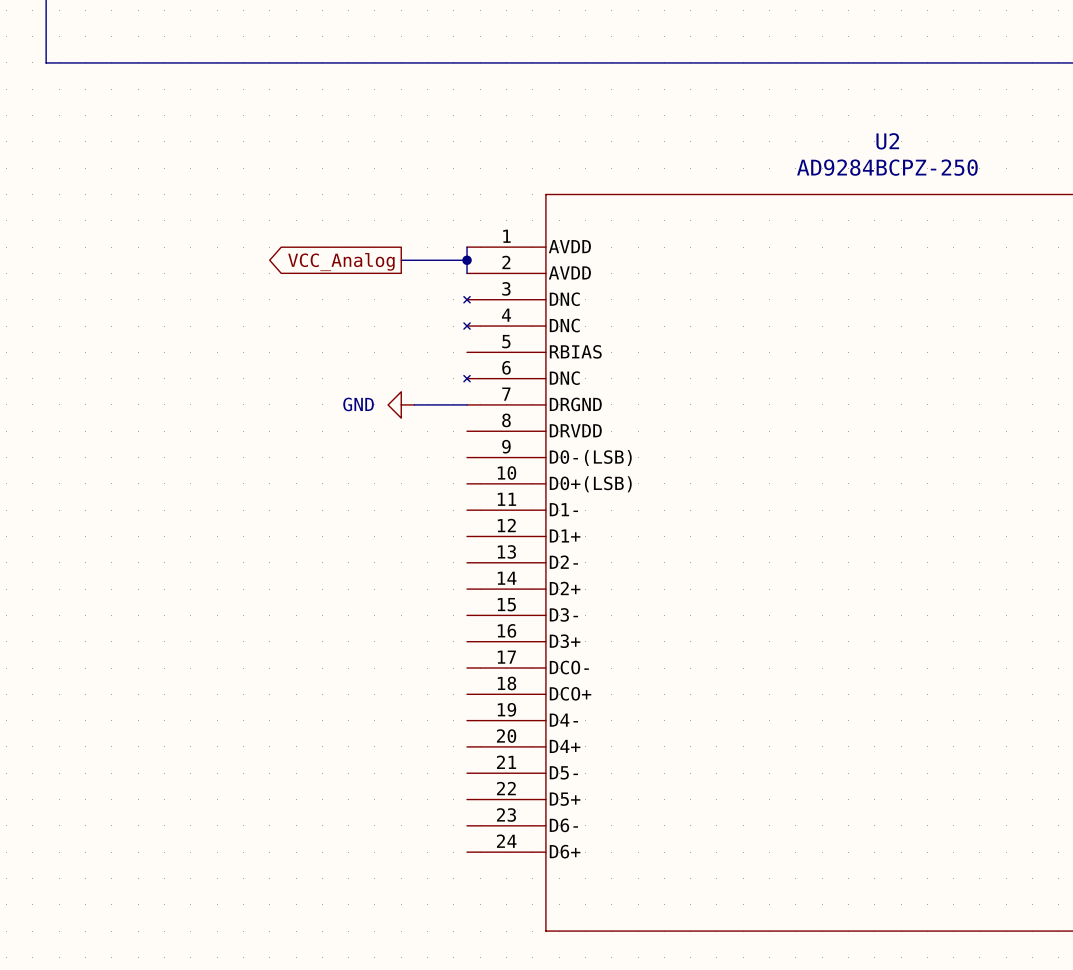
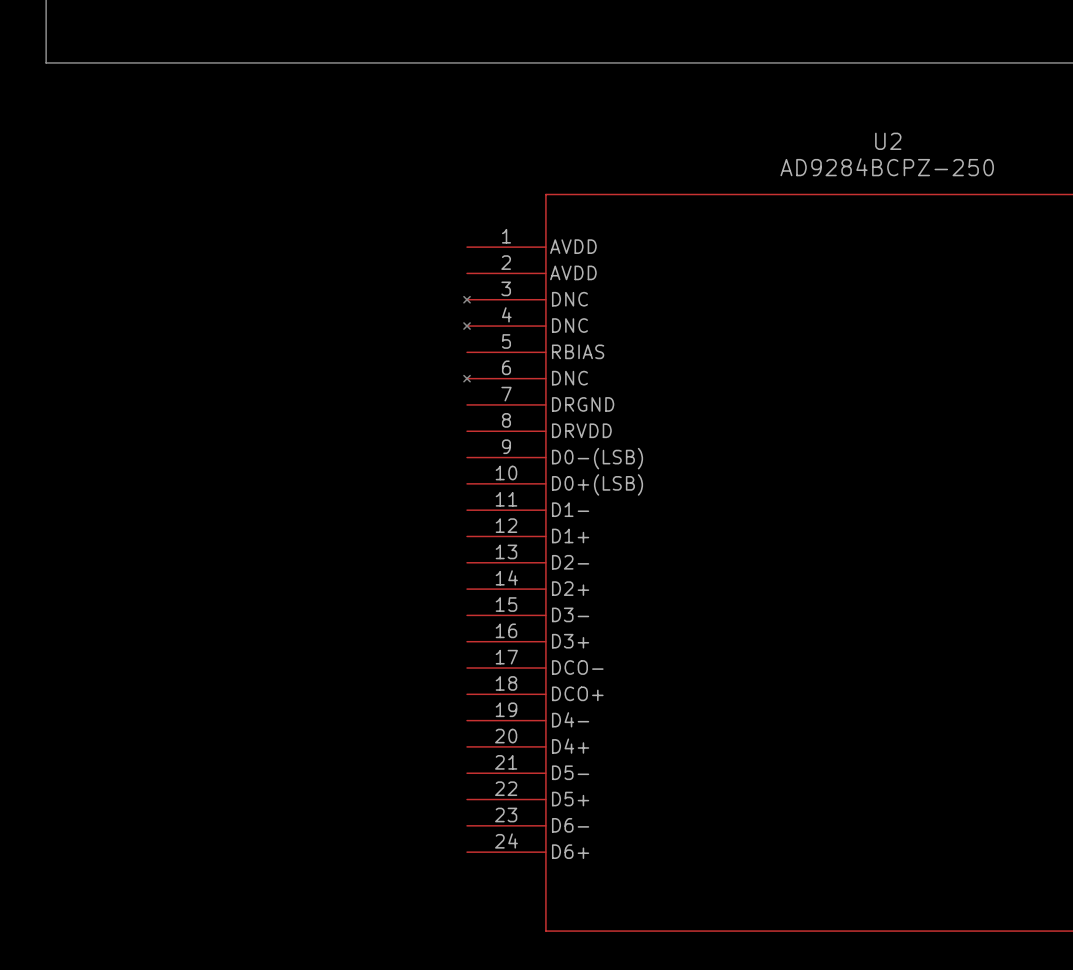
wire: (467, 247) (467, 273) -> none
wire: (401, 260) (467, 260) -> none
junction: (467, 260) -> none
global label: VCC_Analog (341, 262) -> none
power symbol: GND (401, 404) -> none
wire: (414, 404) (467, 404) -> none

